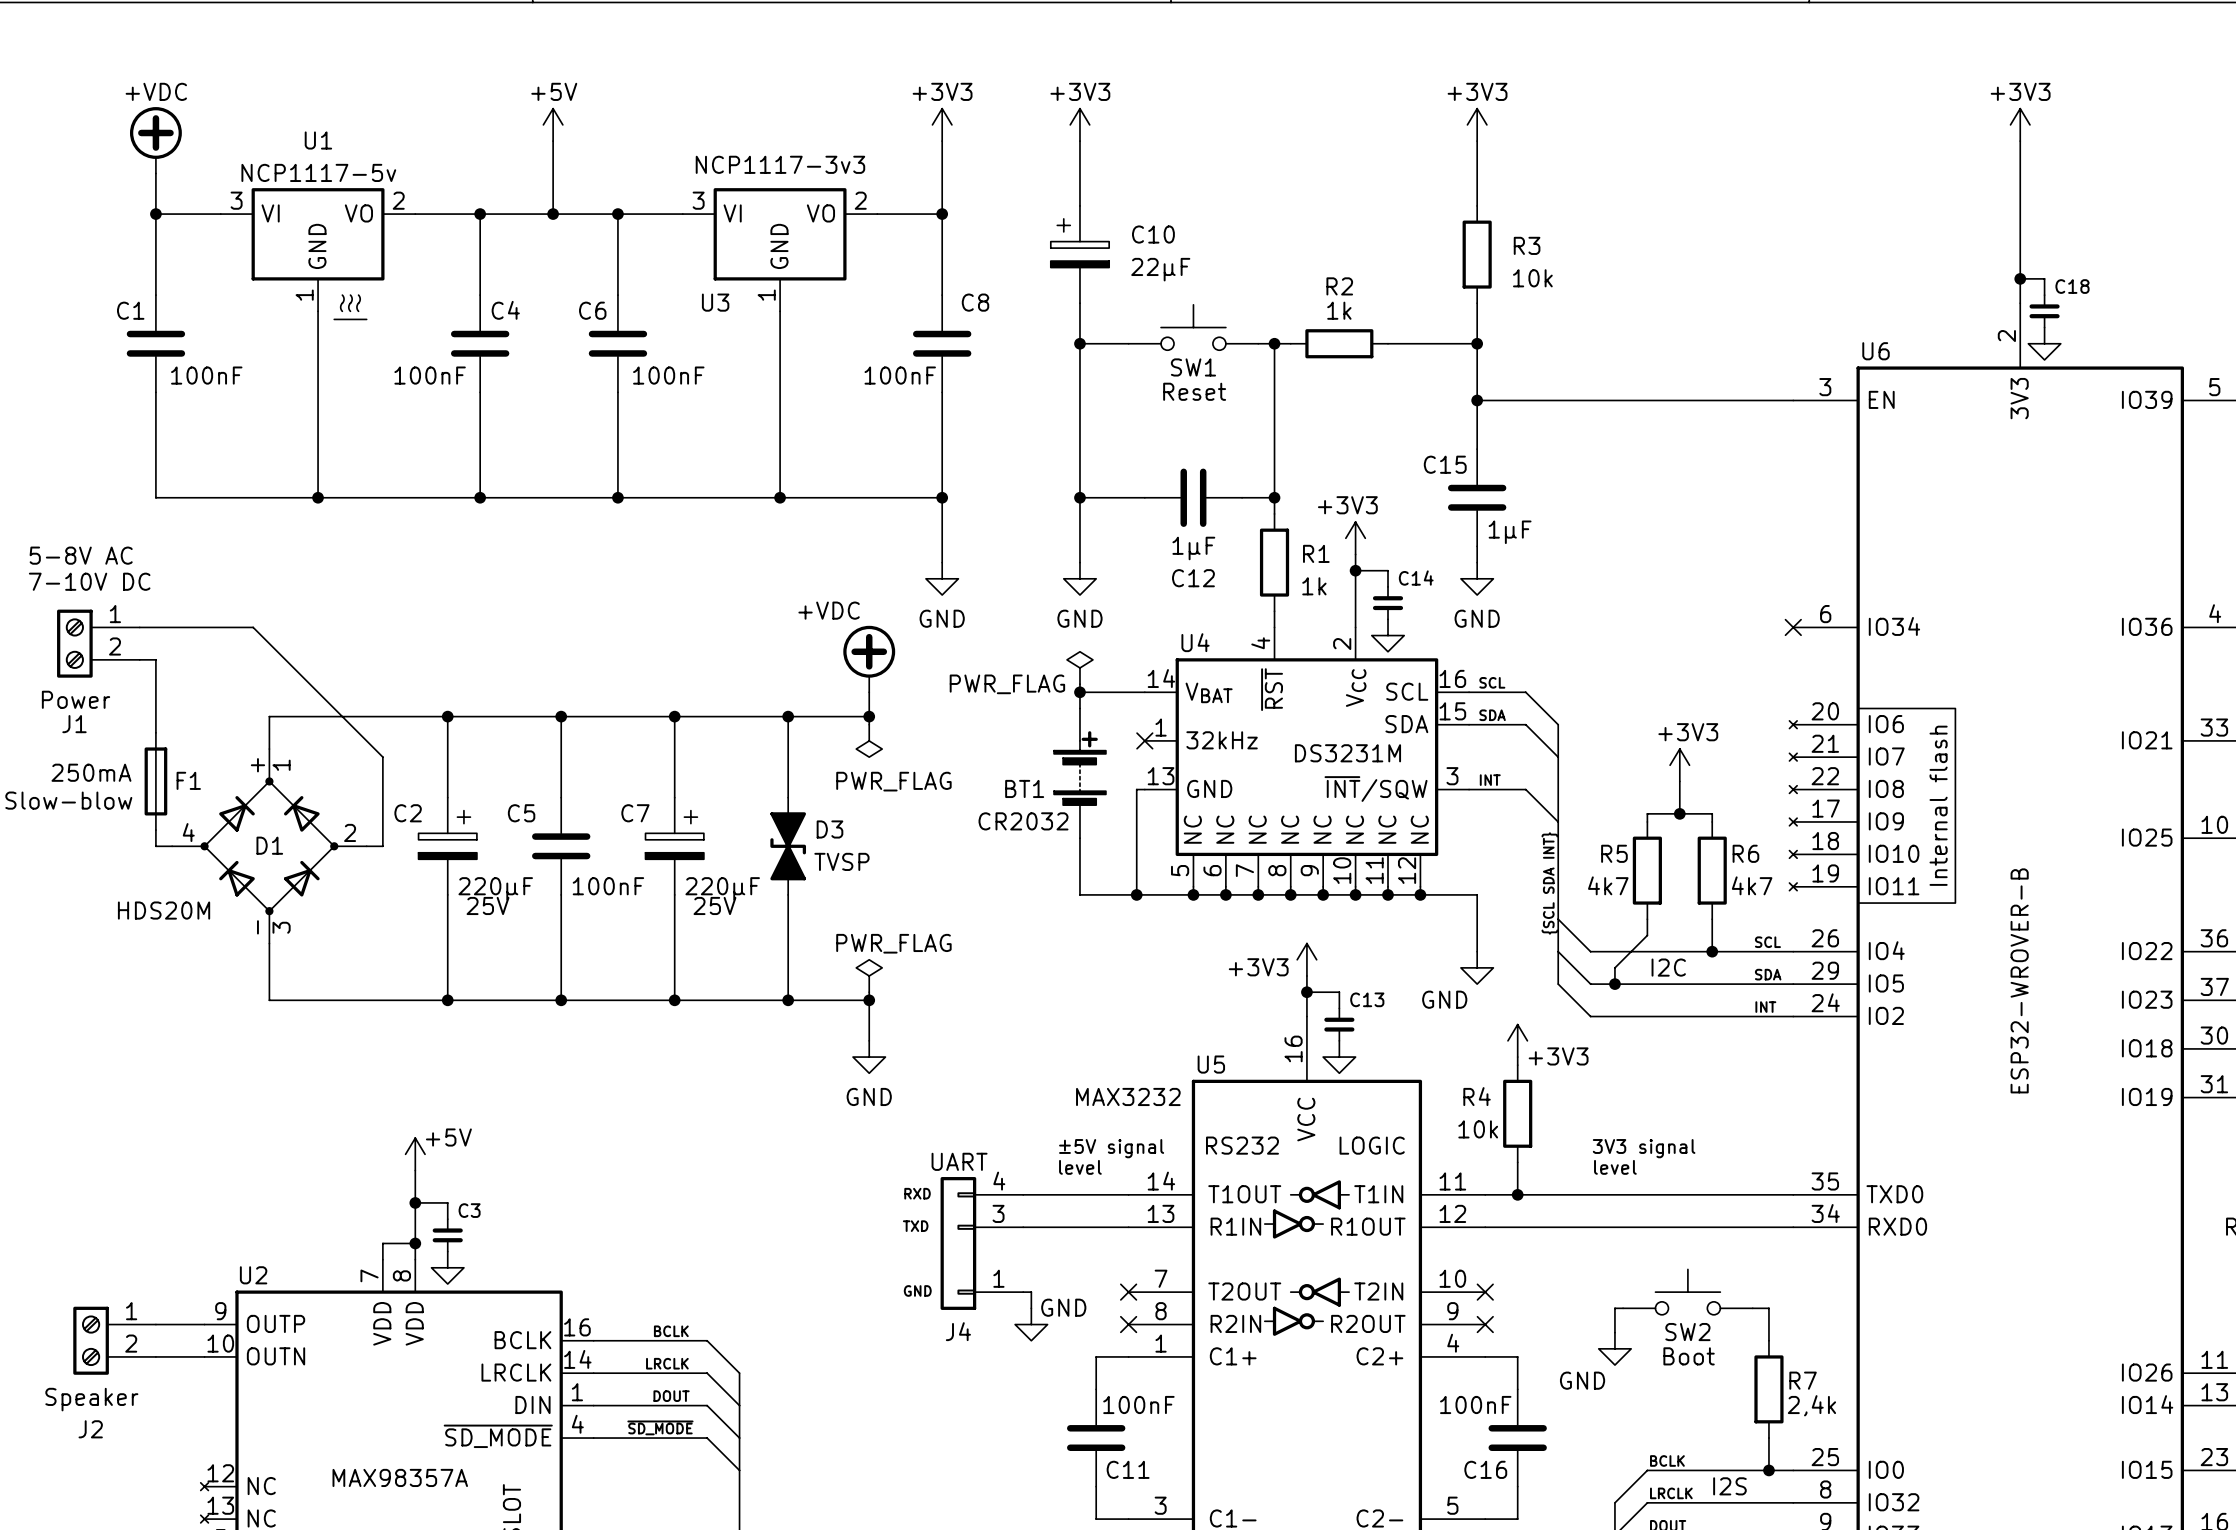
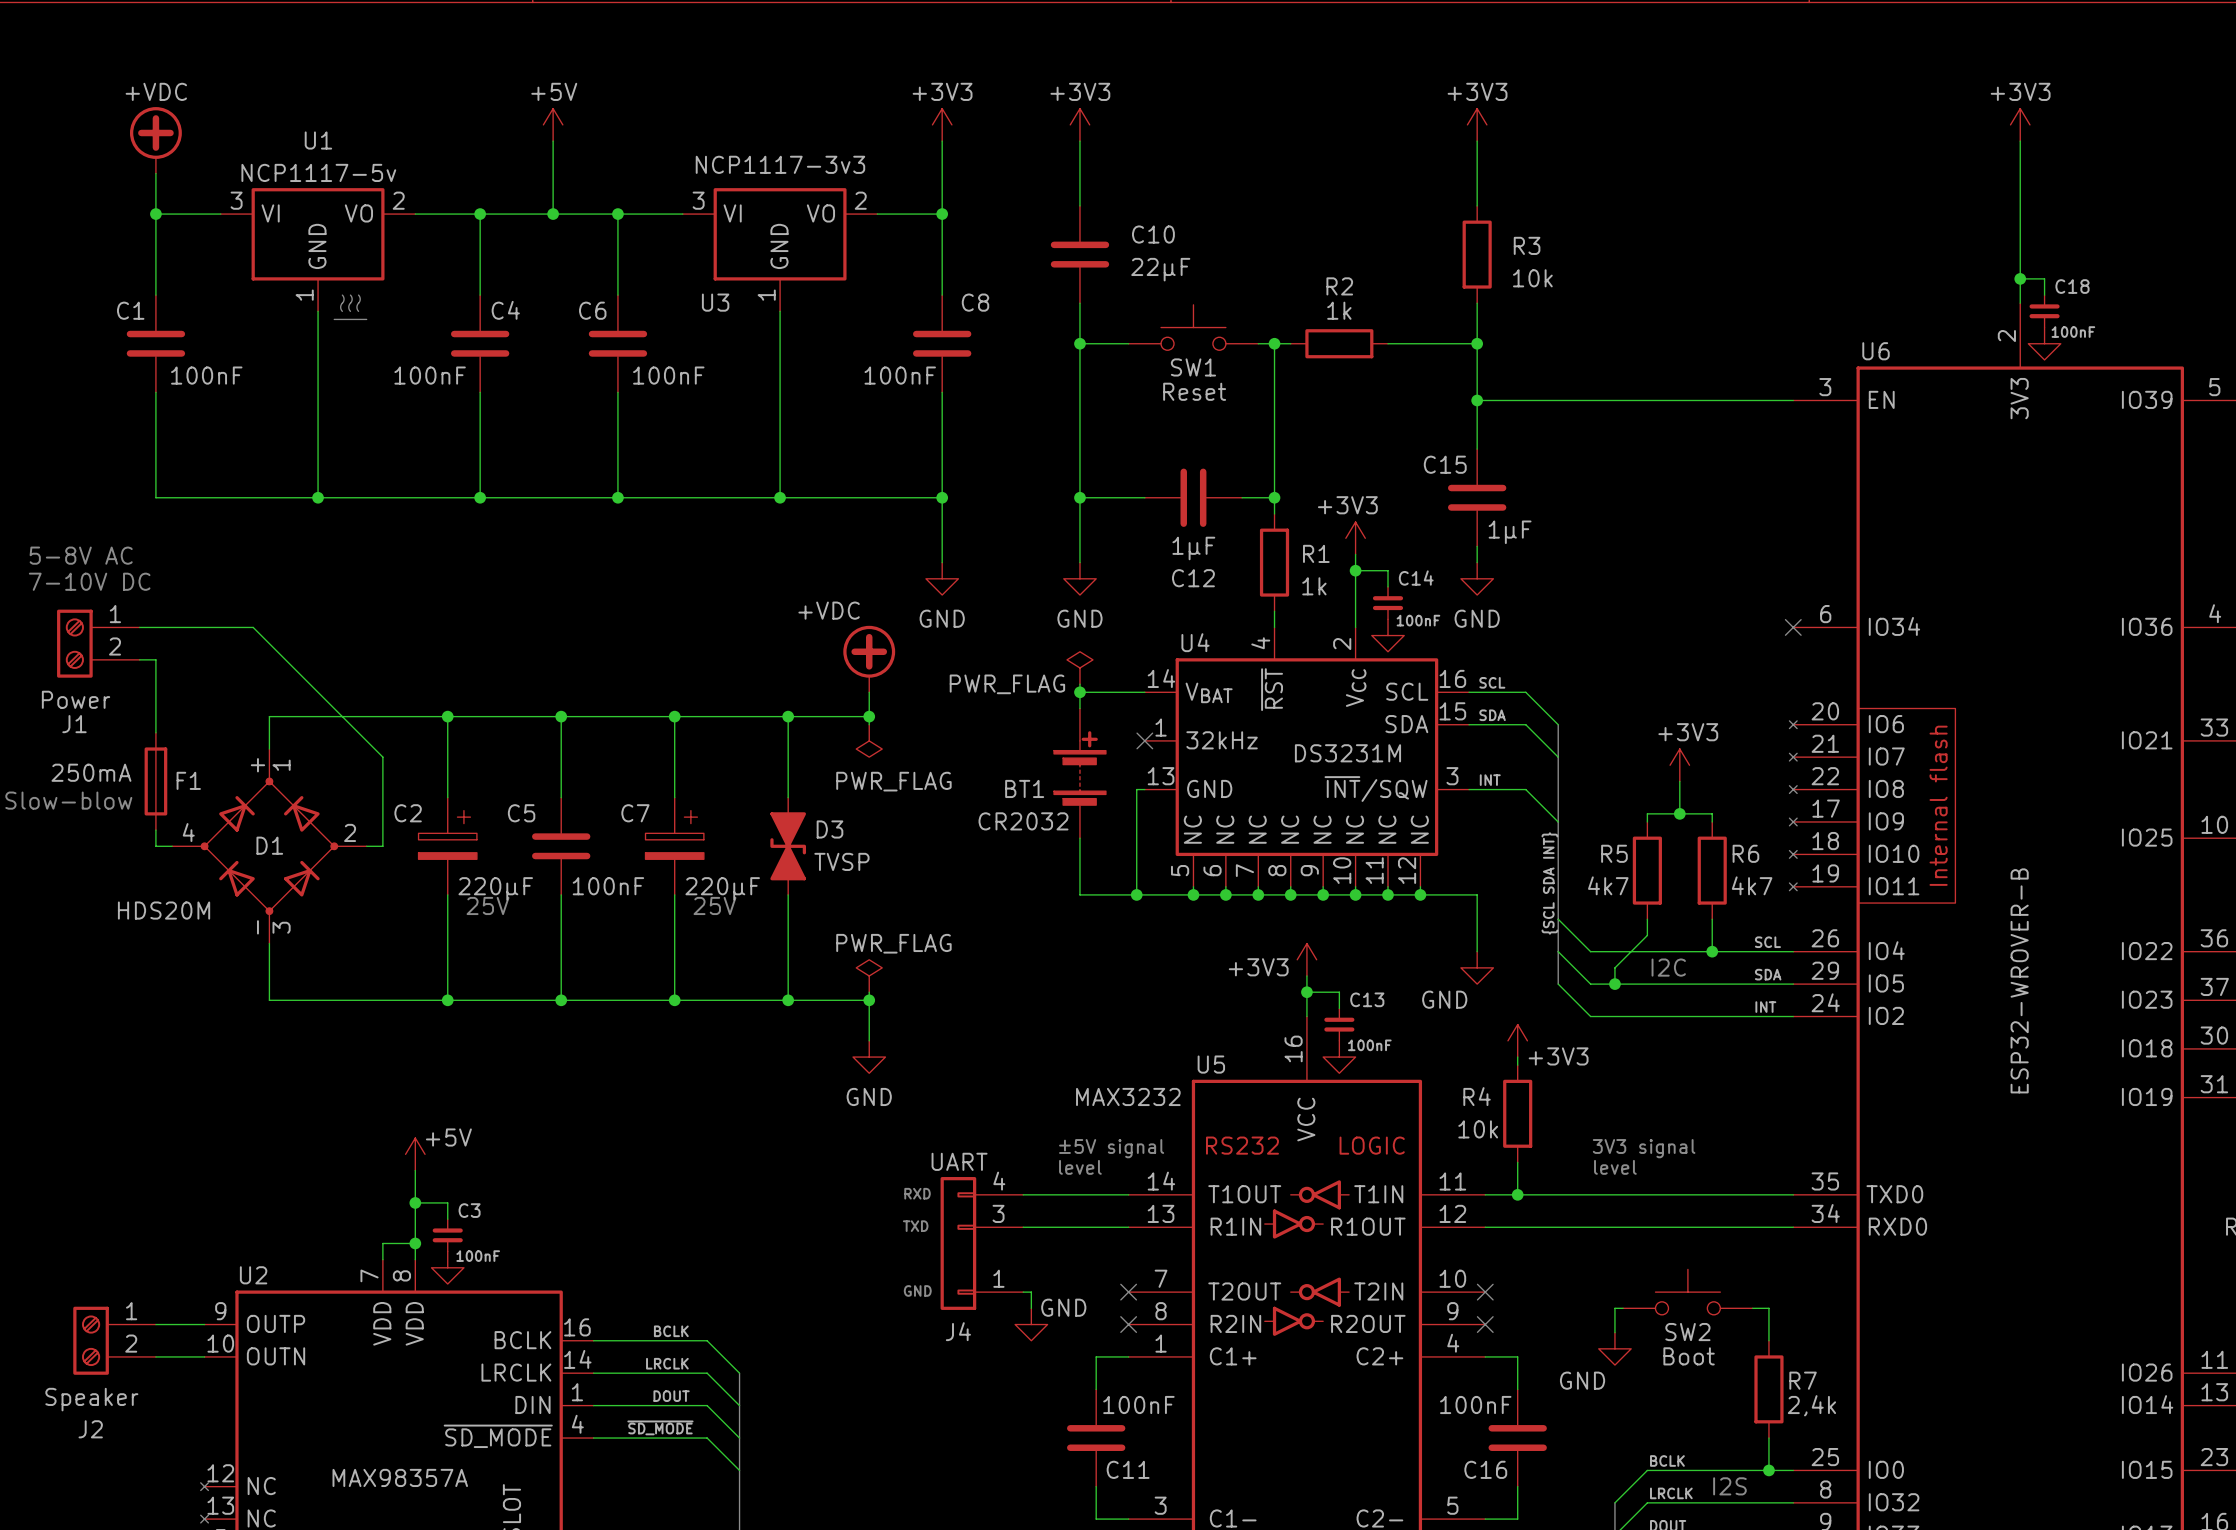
C10 symbol: [1050, 205, 1110, 304] -> [1050, 205, 1110, 304]
C18 value: none -> 100nF (2073, 332)
C14 value: none -> 100nF (1418, 620)
C13 value: none -> 100nF (1369, 1045)
C3 value: none -> 100nF (478, 1256)

